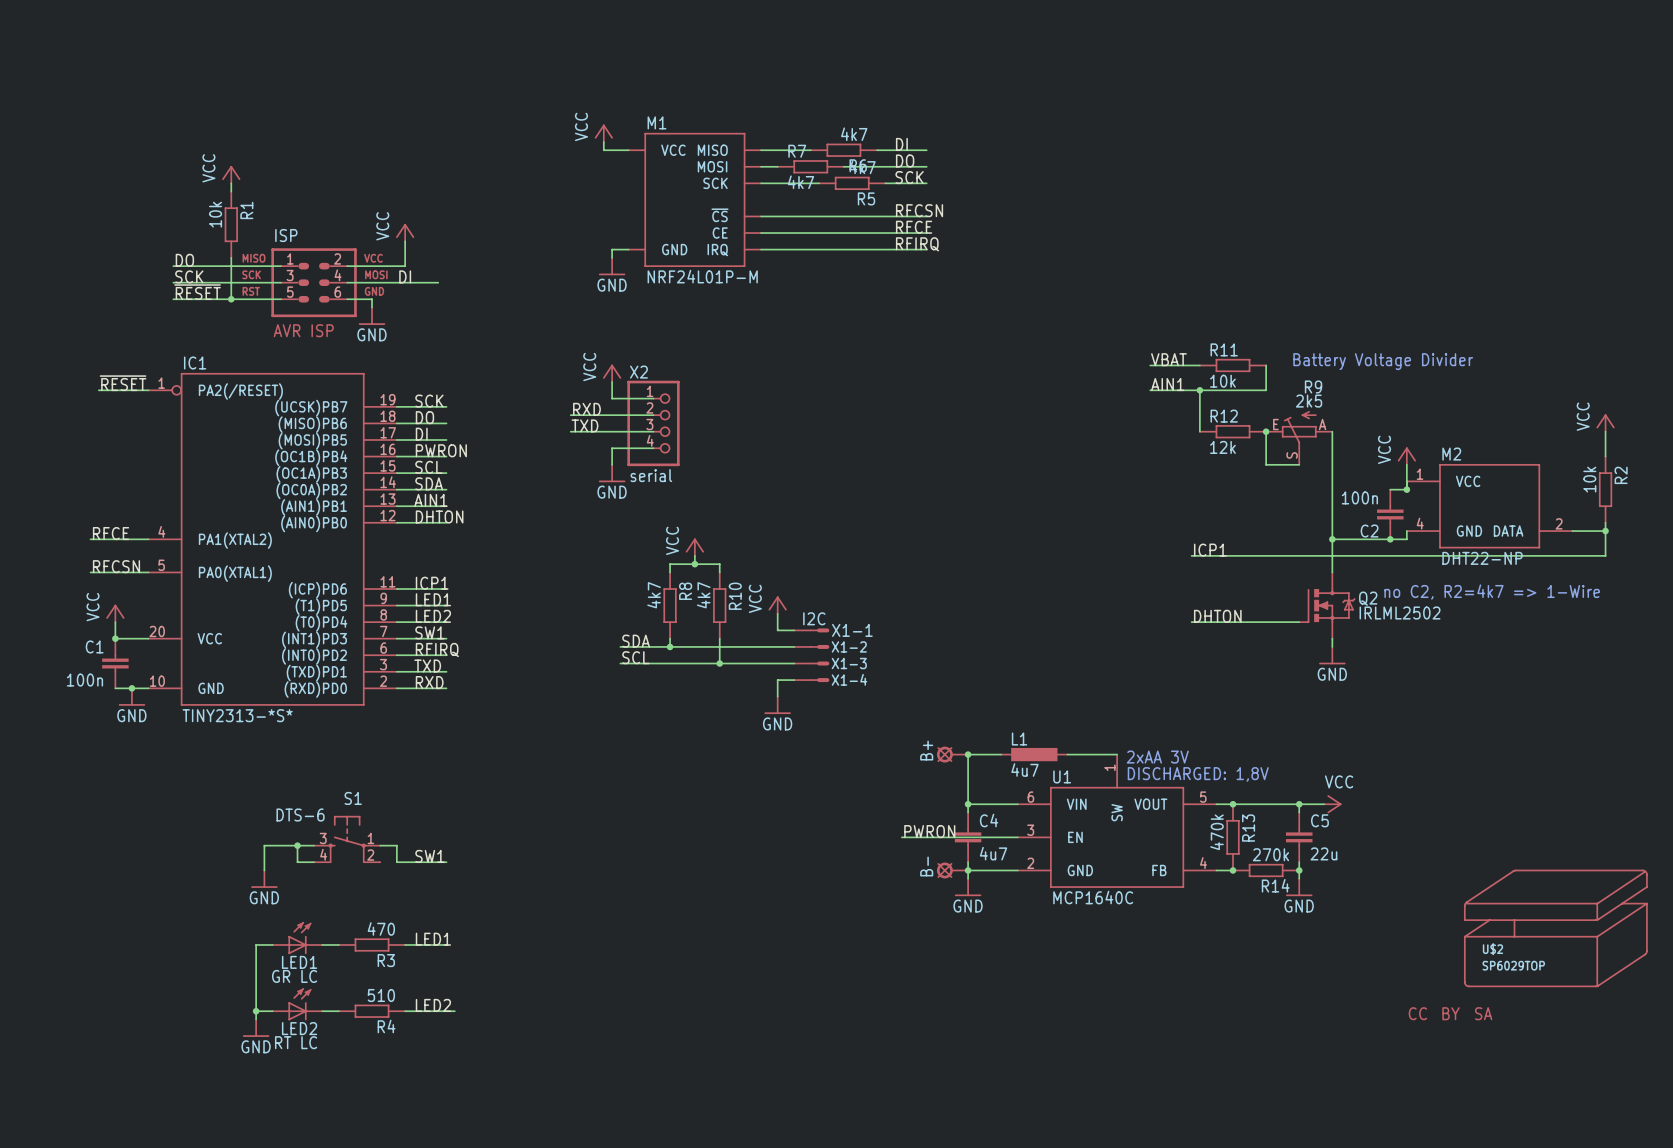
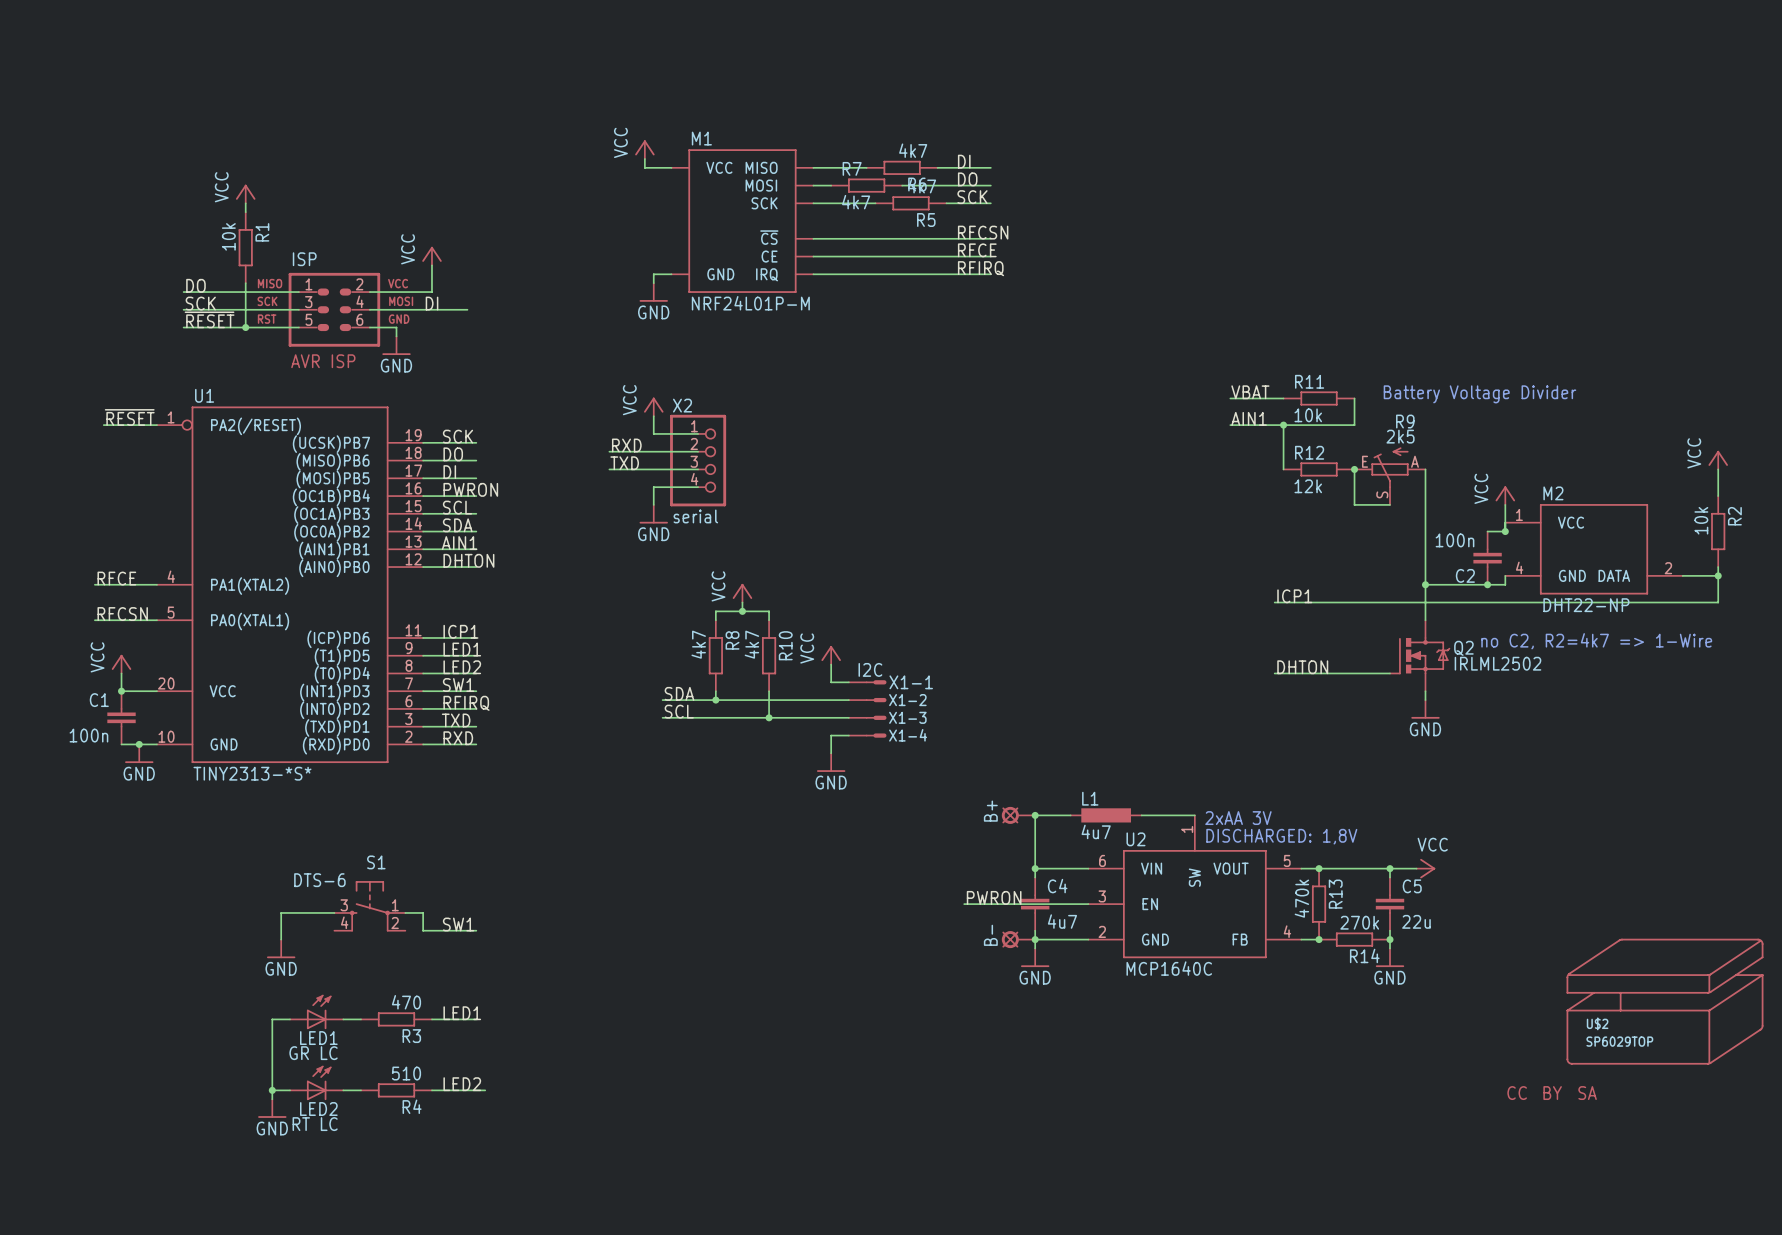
IC1 name: IC1 (195, 363) -> U1 (204, 395)
U1 name: U1 (1062, 776) -> U2 (1135, 839)
wire: (297, 845) (297, 862) (314, 862) -> none
junction: (297, 845) -> none

